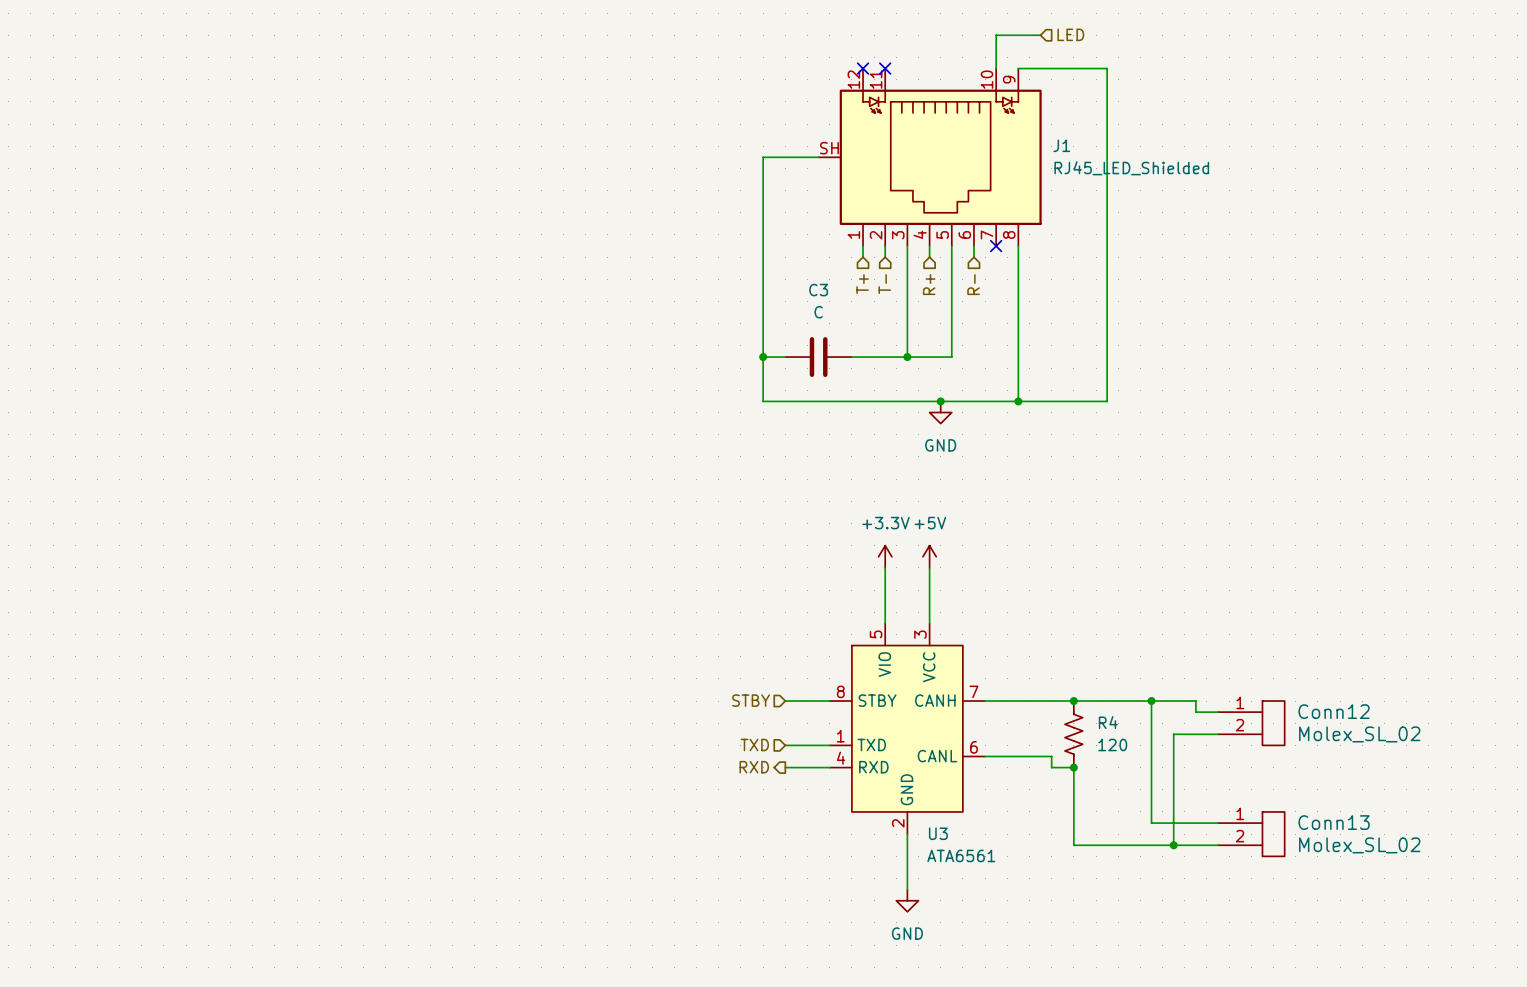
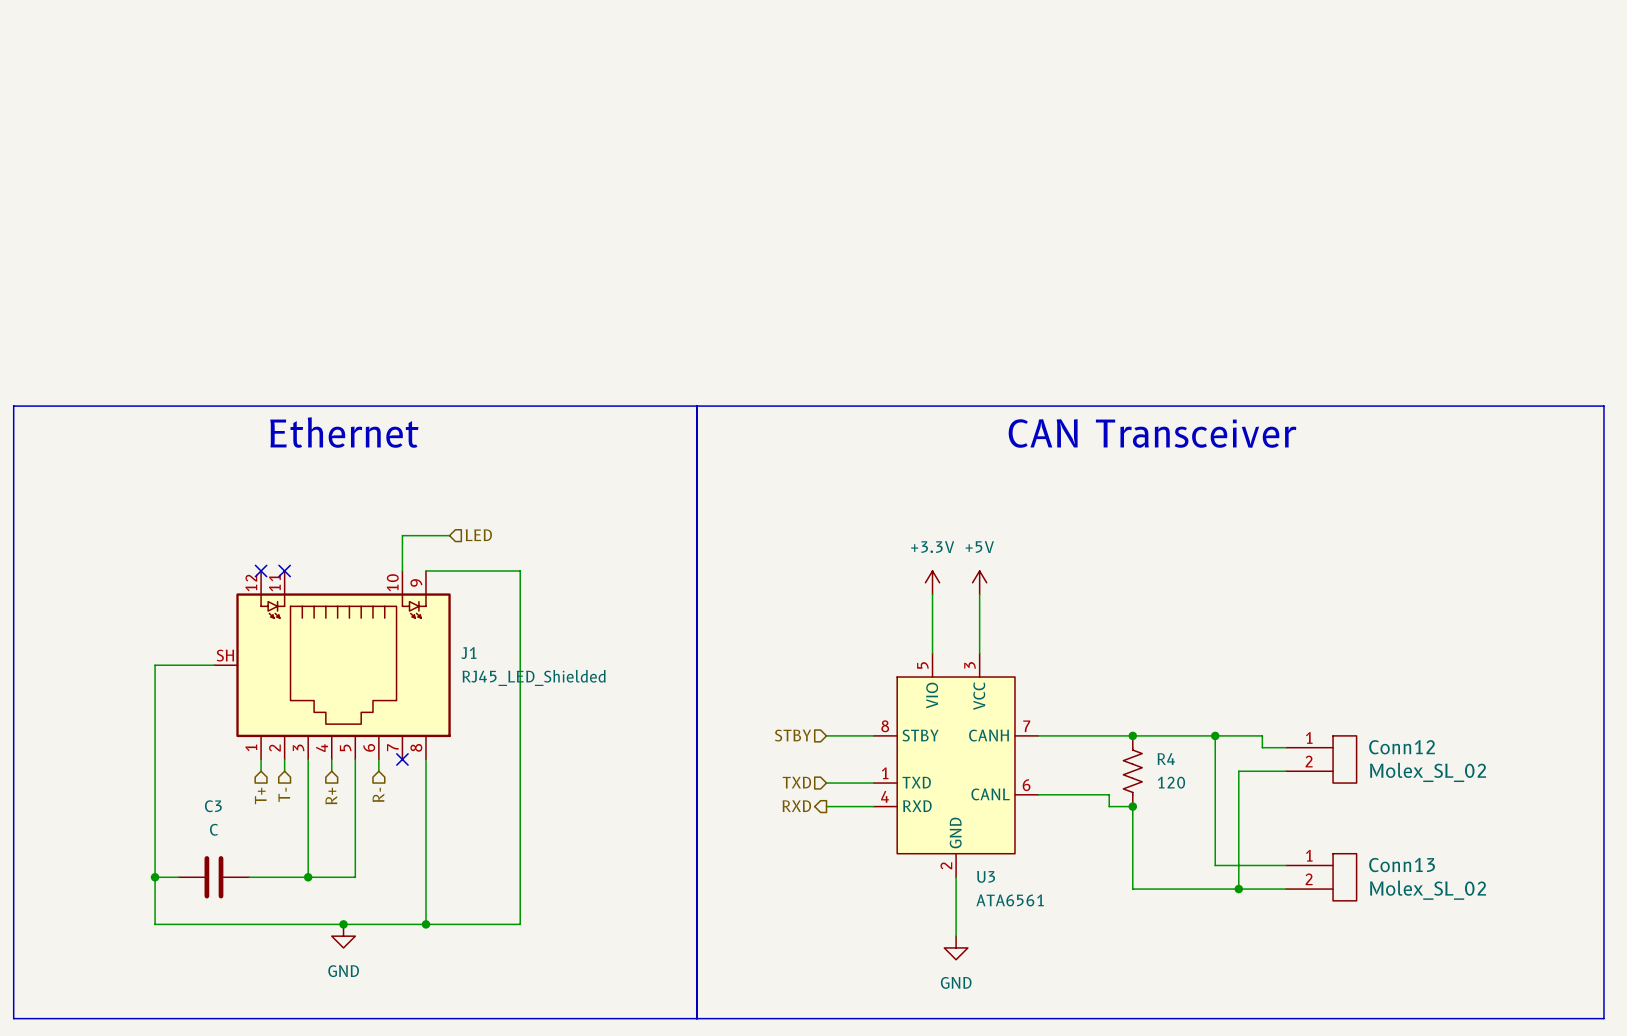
hierarchical label: LED (1070, 34) -> none
wire: (1040, 35) (996, 35) (996, 68) -> none
no-connect mark: (863, 68) -> none
no-connect mark: (885, 68) -> none
wire: (1018, 68) (1107, 68) (1107, 401) (763, 401) (763, 157) (818, 157) -> none
J1 position: (930, 157) -> (332, 665)
wire: (863, 246) (863, 257) -> none
wire: (885, 246) (885, 257) -> none
wire: (907, 246) (907, 357) -> none
wire: (929, 246) (929, 257) -> none
wire: (951, 246) (951, 357) (851, 357) -> none
wire: (973, 246) (973, 257) -> none
no-connect mark: (996, 246) -> none
wire: (1018, 246) (1018, 401) -> none
hierarchical label: T+ (862, 284) -> none
hierarchical label: T- (884, 284) -> none
hierarchical label: R+ (929, 284) -> none
hierarchical label: R- (973, 284) -> none
wire: (763, 357) (785, 357) -> none
junction: (763, 357) -> none
C3 position: (818, 357) -> (213, 877)
junction: (907, 357) -> none
line: none -> (13, 406) (1603, 406) (1603, 1018) (13, 1018) (13, 406)
line: none -> (696, 406) (696, 1018)
junction: (940, 401) -> none
junction: (1018, 401) -> none
power symbol: GND (940, 412) -> none
text: none -> Ethernet (344, 432)
text: none -> CAN Transceiver (1152, 433)
hierarchical label: none -> LED (478, 535)
wire: none -> (449, 535) (402, 535) (402, 570)
no-connect mark: none -> (261, 570)
no-connect mark: none -> (284, 570)
wire: none -> (425, 570) (520, 570) (520, 924) (155, 924) (155, 665) (213, 665)
wire: none -> (261, 759) (261, 771)
wire: none -> (284, 759) (284, 771)
wire: none -> (308, 759) (308, 877)
wire: none -> (331, 759) (331, 771)
wire: none -> (355, 759) (355, 877) (249, 877)
wire: none -> (378, 759) (378, 771)
no-connect mark: none -> (402, 759)
wire: none -> (425, 759) (425, 924)
hierarchical label: none -> T+ (260, 795)
hierarchical label: none -> T- (284, 794)
hierarchical label: none -> R+ (331, 796)
hierarchical label: none -> R- (378, 794)
wire: none -> (155, 877) (178, 877)
junction: none -> (155, 877)
junction: none -> (308, 877)
junction: none -> (343, 924)
junction: none -> (425, 924)
power symbol: none -> GND (343, 936)

